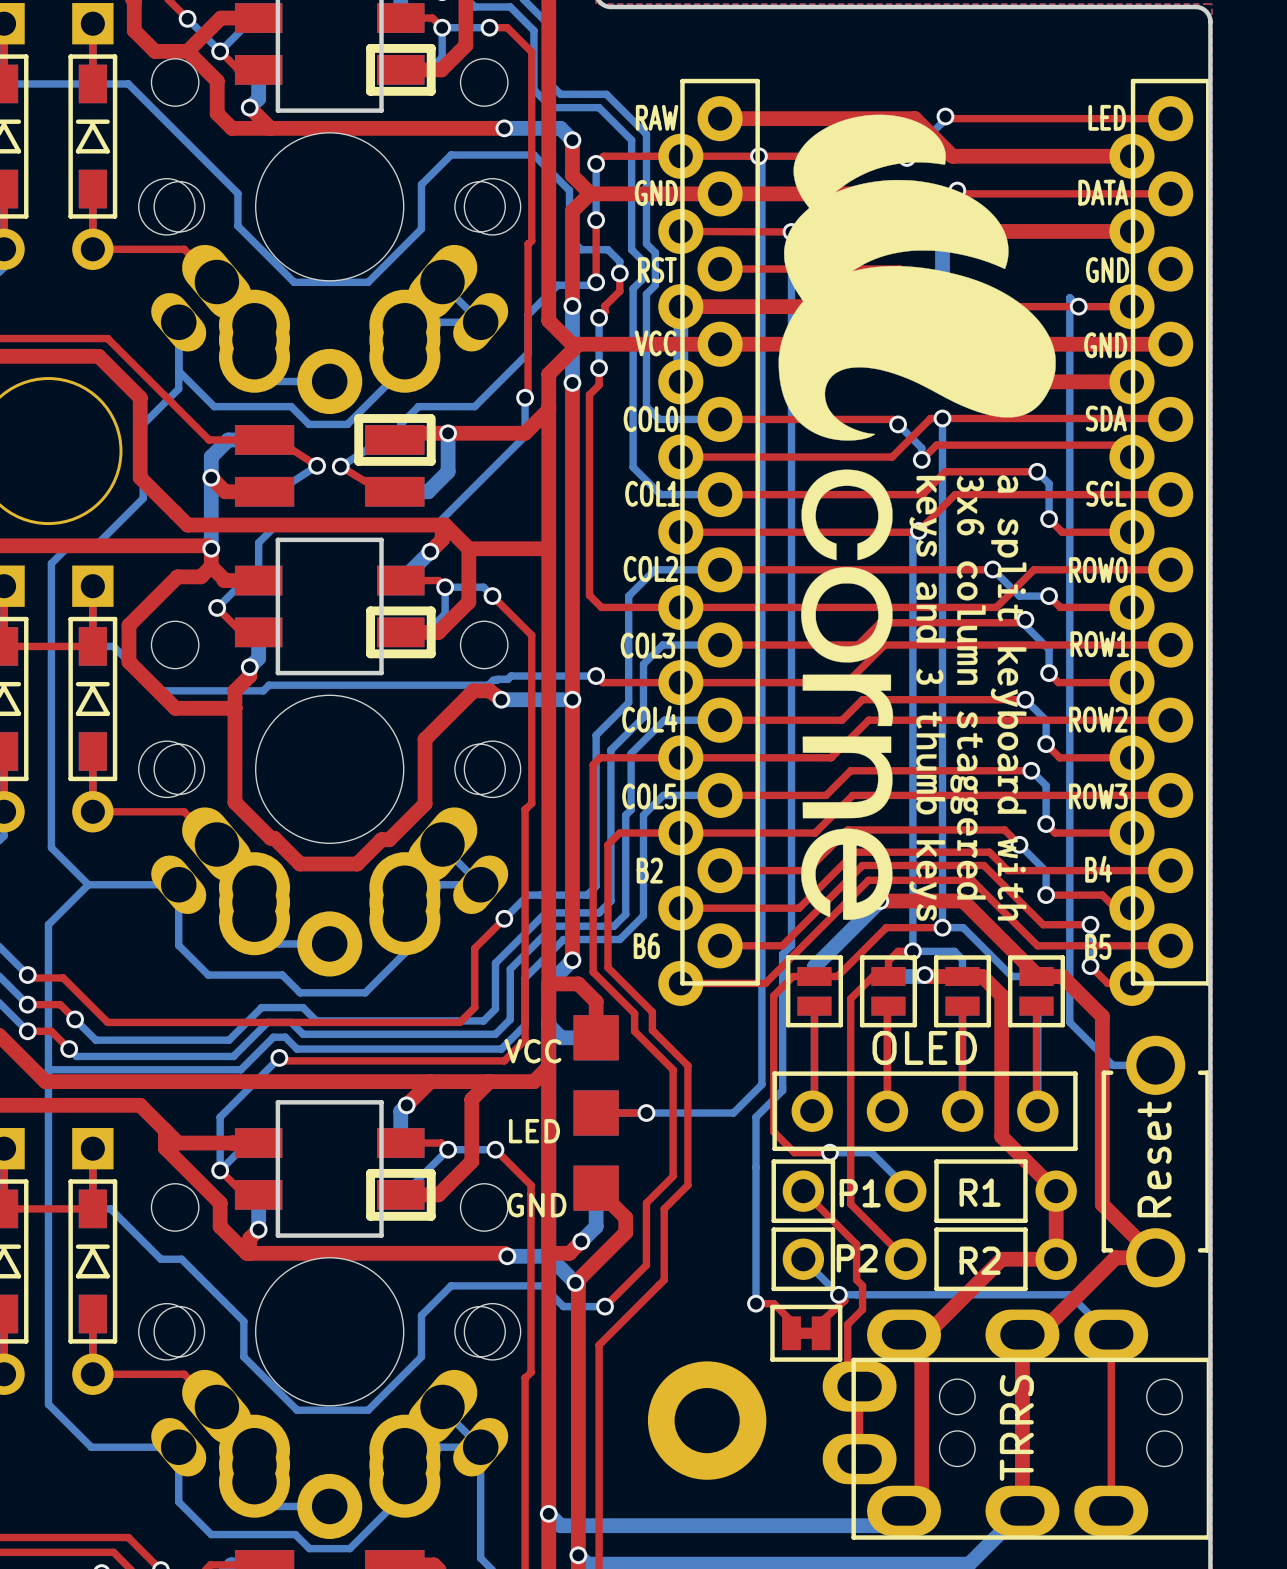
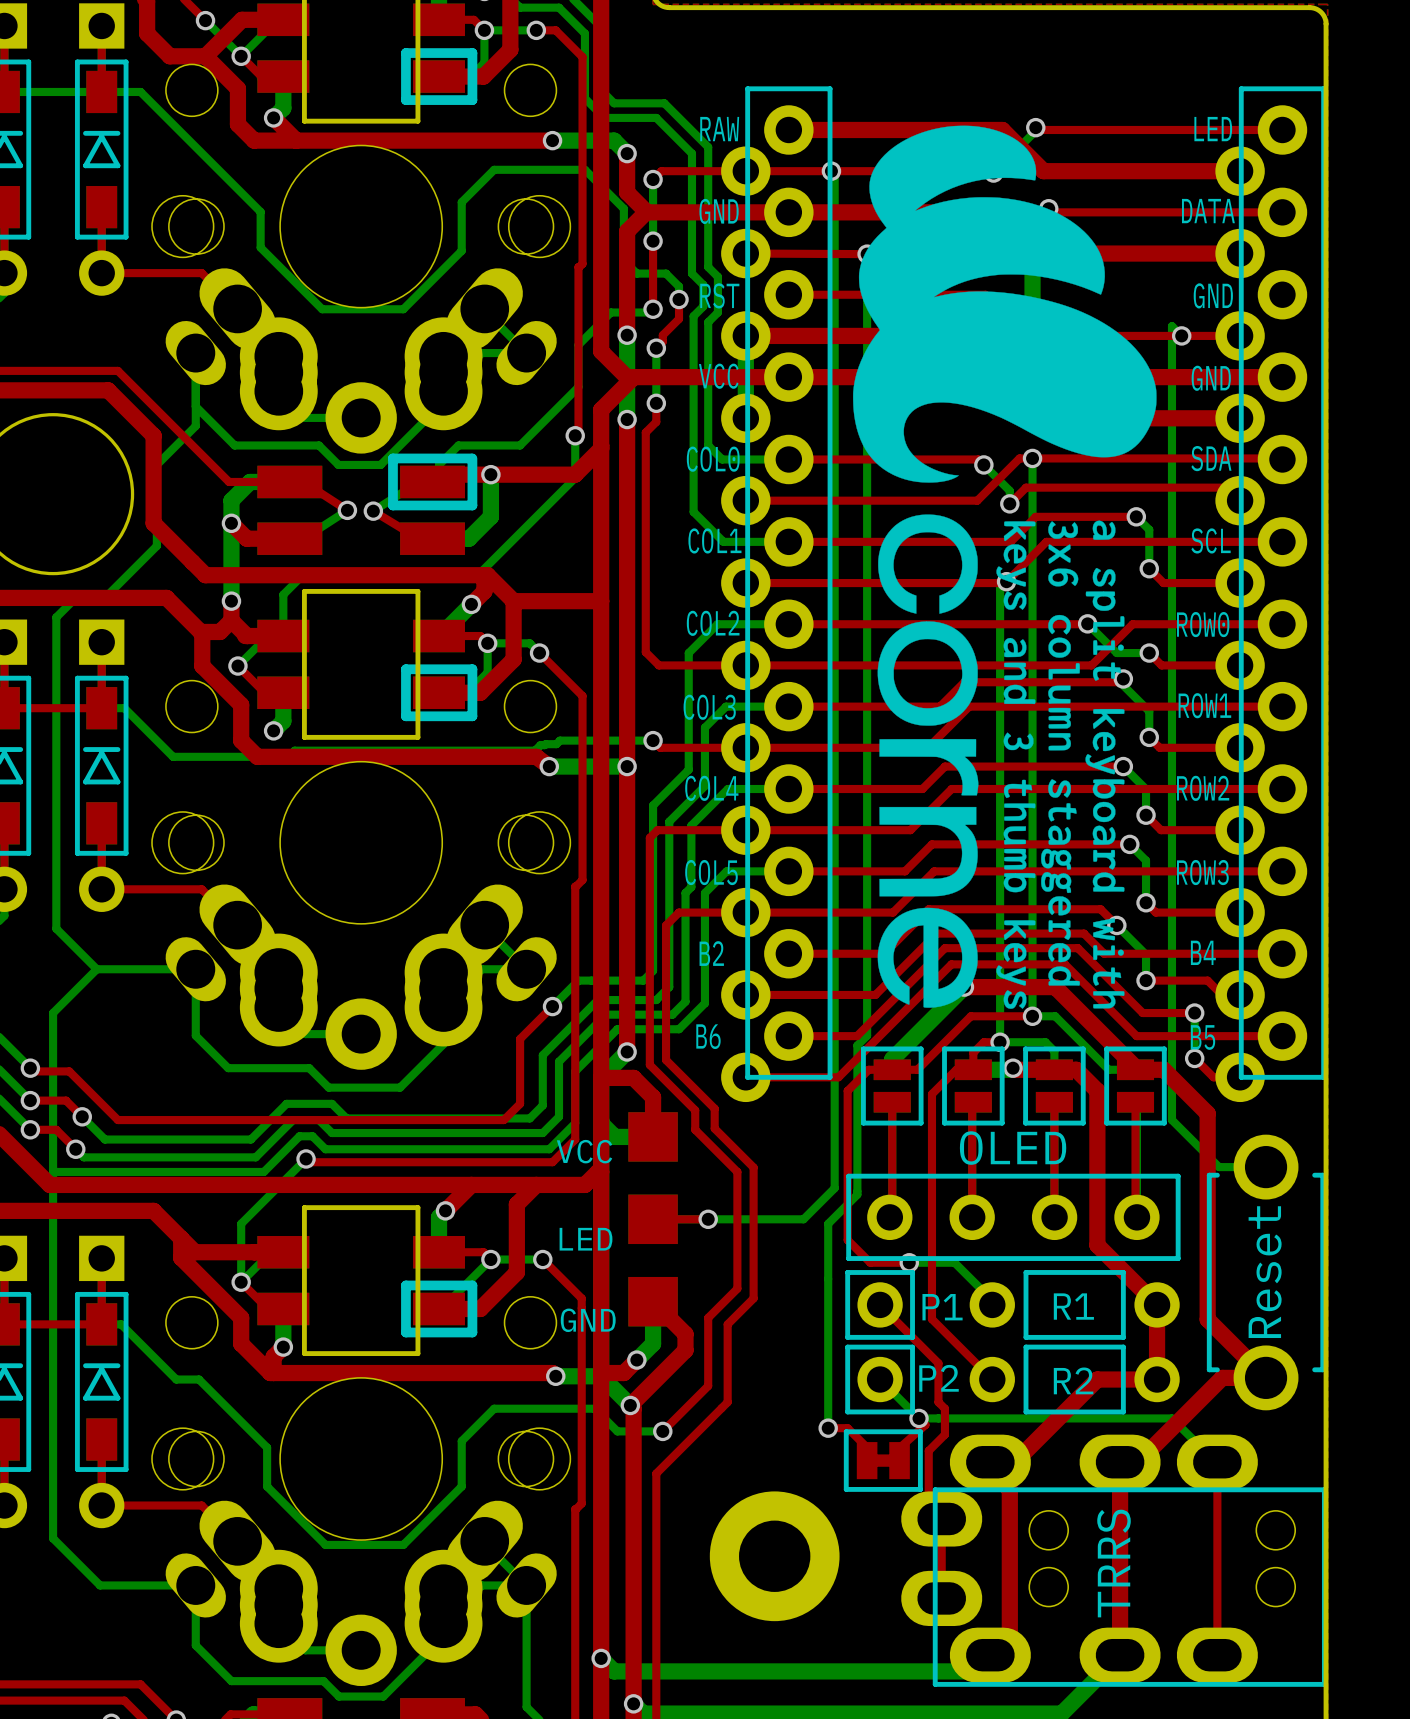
top track: (152, 545) (208, 545) (211, 548) -> none
top track: (183, 576) (177, 576) (128, 625) (128, 661) (175, 708) (234, 708) -> none
top track: (249, 667) (249, 676) (234, 690) (234, 802) (300, 864) (357, 864) (381, 839) (389, 839) (425, 803) (425, 739) (473, 690) -> (166, 597) (202, 633) (202, 666) (241, 704) (241, 740) (257, 756) (518, 756)

